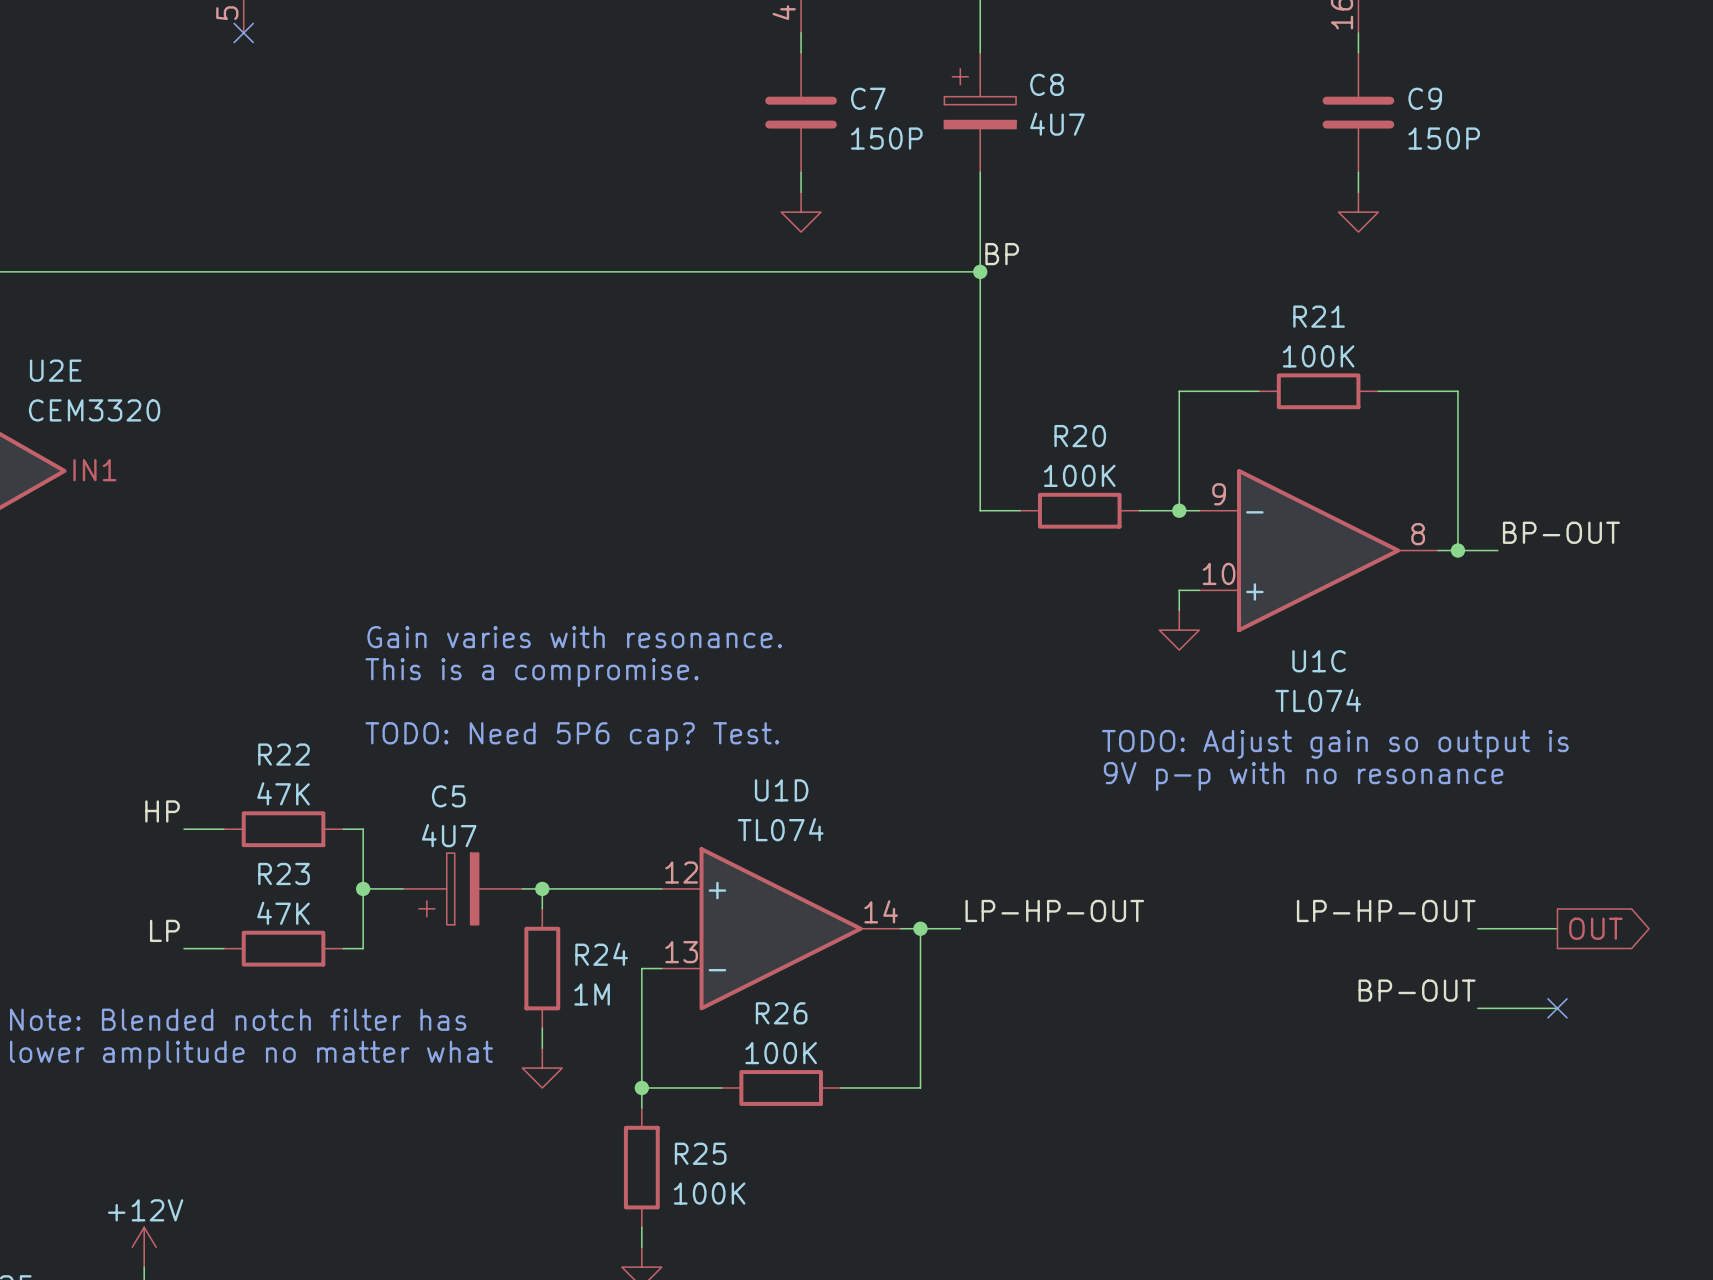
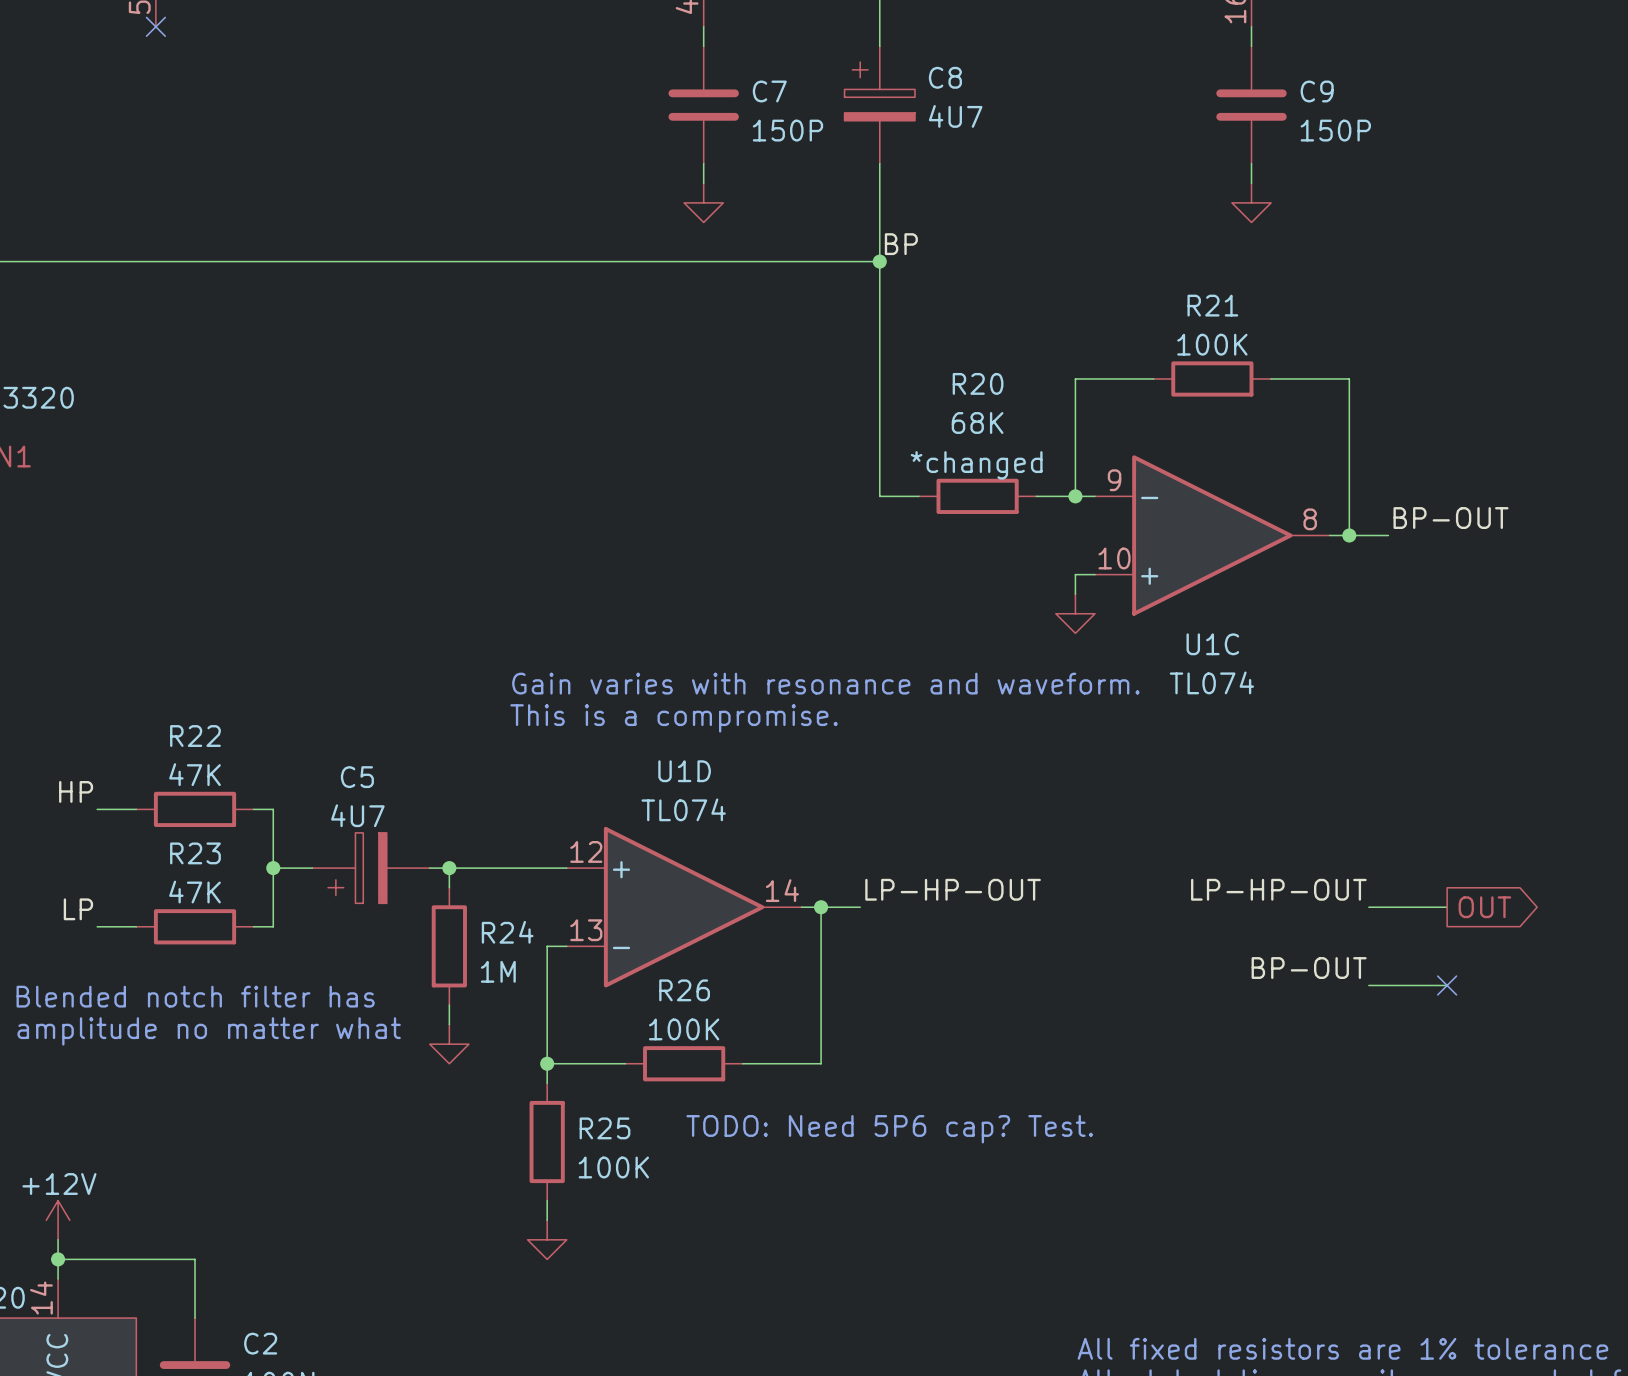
R20 name position: R20 (1080, 436) -> R20 (978, 383)
R20 value: 100K (1079, 475) -> 68K (977, 422)
R20 text: none -> *changed (976, 465)
text: Gain varies with resonance. (574, 637) -> none
text position: This is a compromise. (532, 672) -> This is a compromise. (674, 718)
text: none -> Gain varies with resonance and waveform. (825, 683)
text: TODO: Need 5P6 cap? Test. (572, 736) -> none
text: TODO: Adjust gain so output is (1335, 744) -> none
text: 9V p-p with no resonance (1303, 776) -> none
text: none -> TODO: Need 5P6 cap? Test. (889, 1129)

